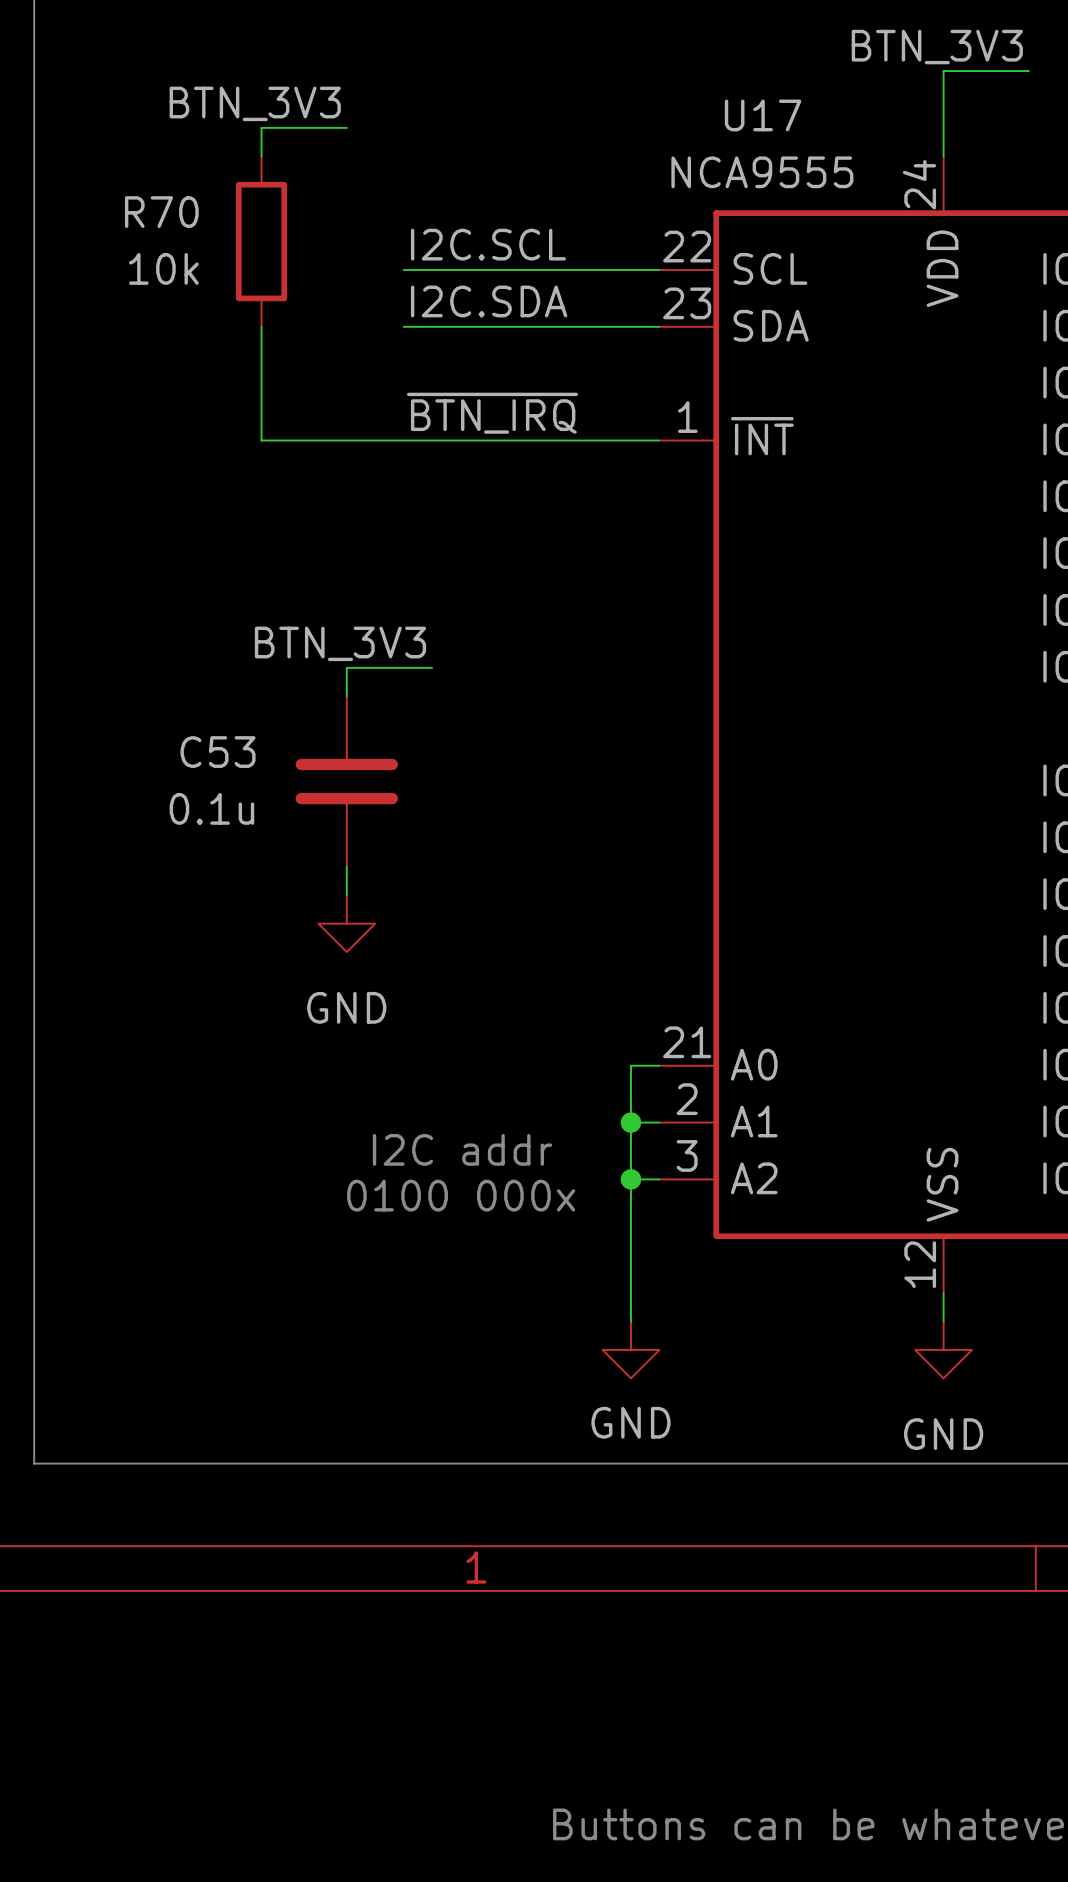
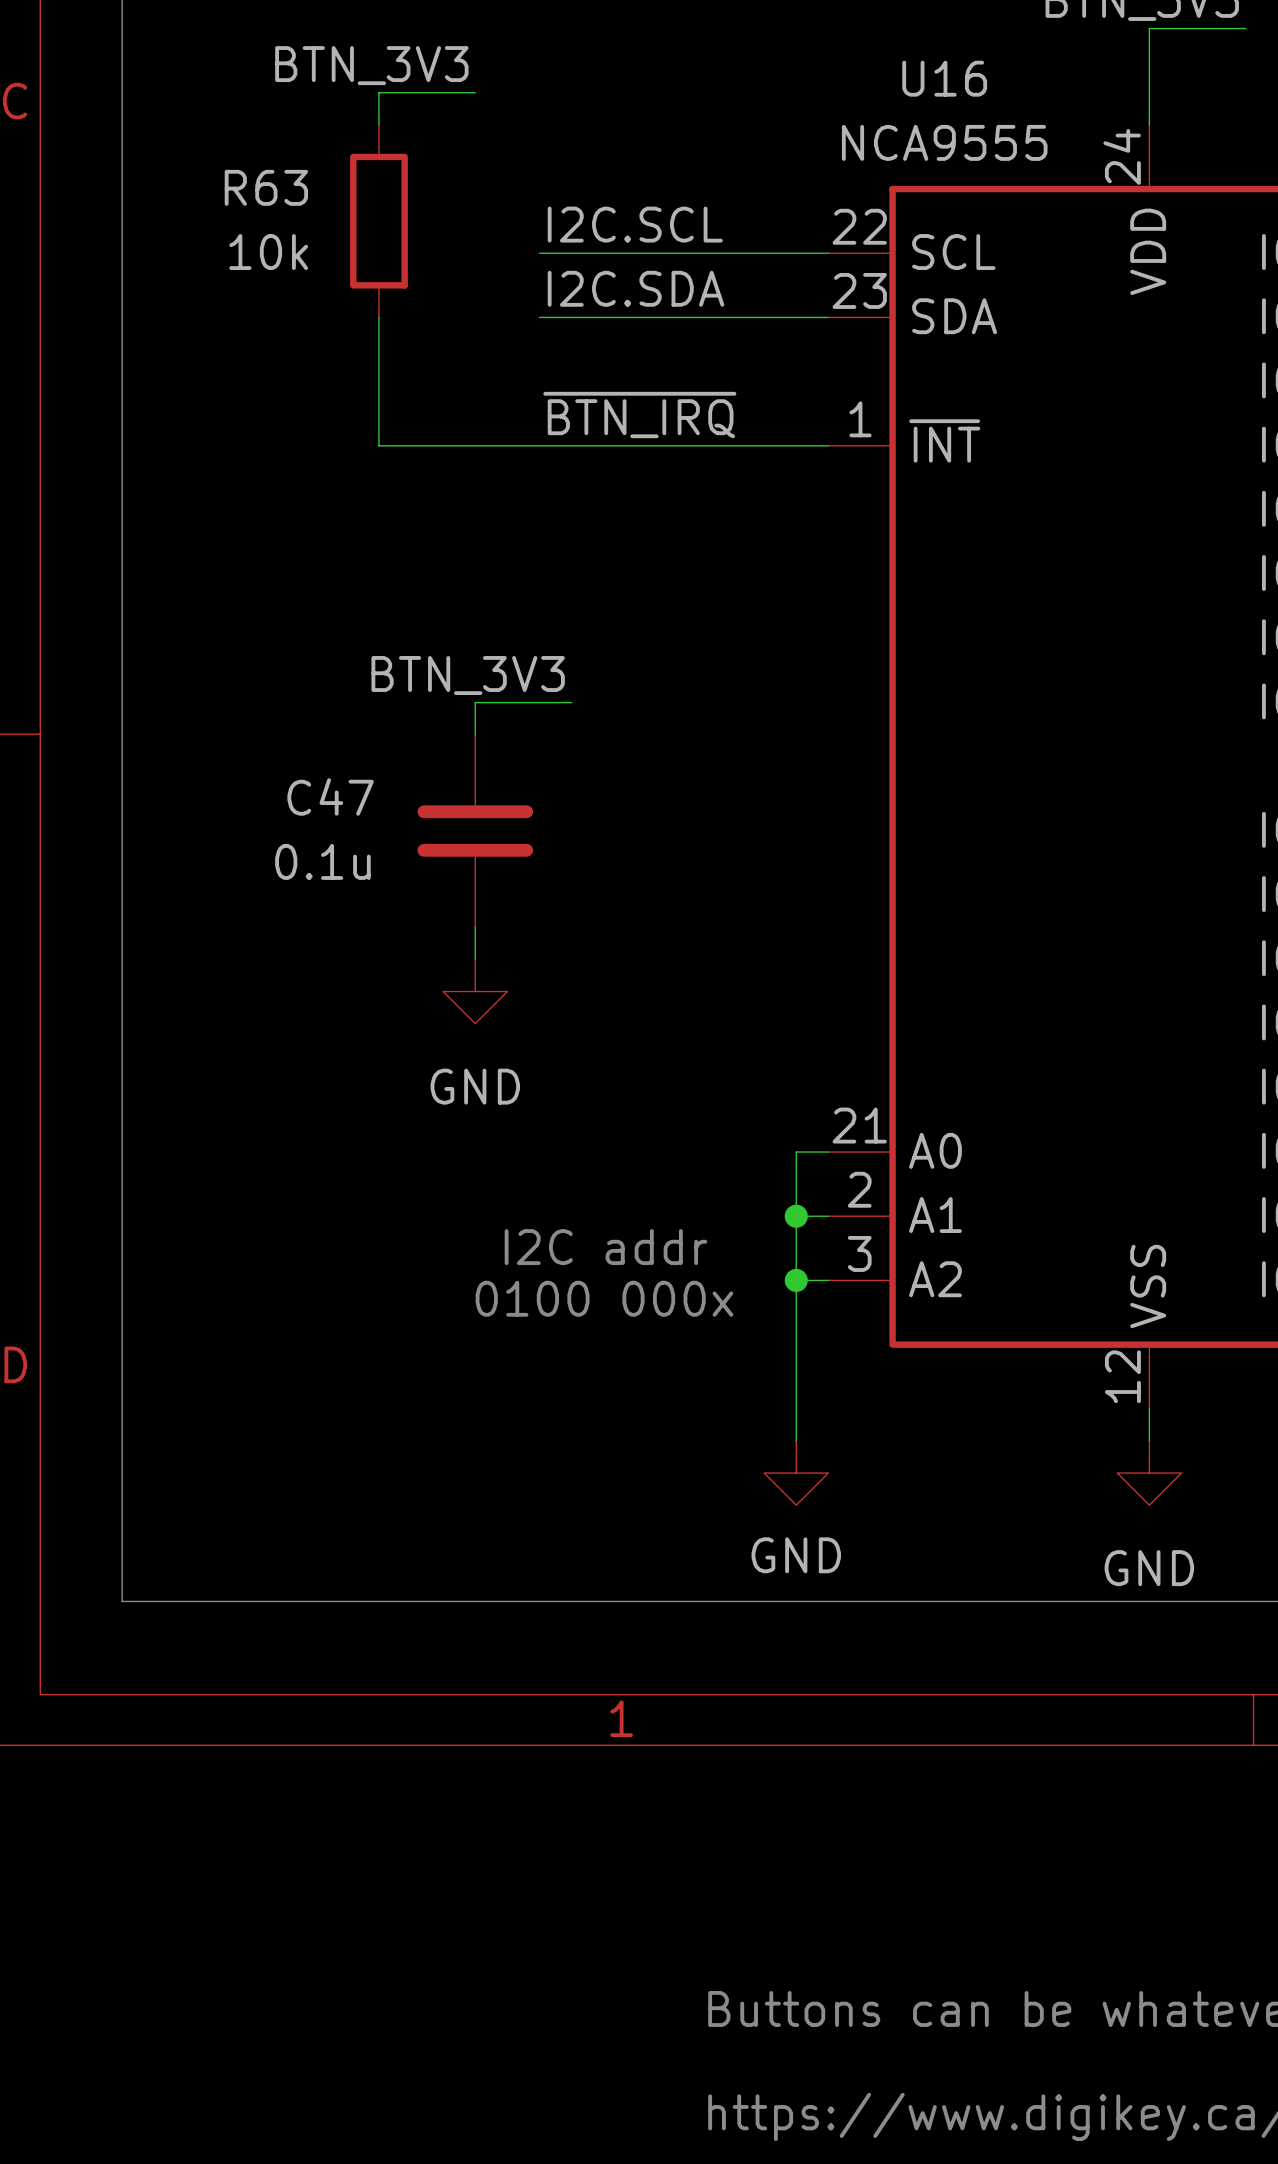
U17 name: U17 (763, 115) -> U16 (944, 78)
R70 name: R70 (161, 212) -> R63 (266, 187)
C53 name: C53 (218, 752) -> C47 (330, 796)

